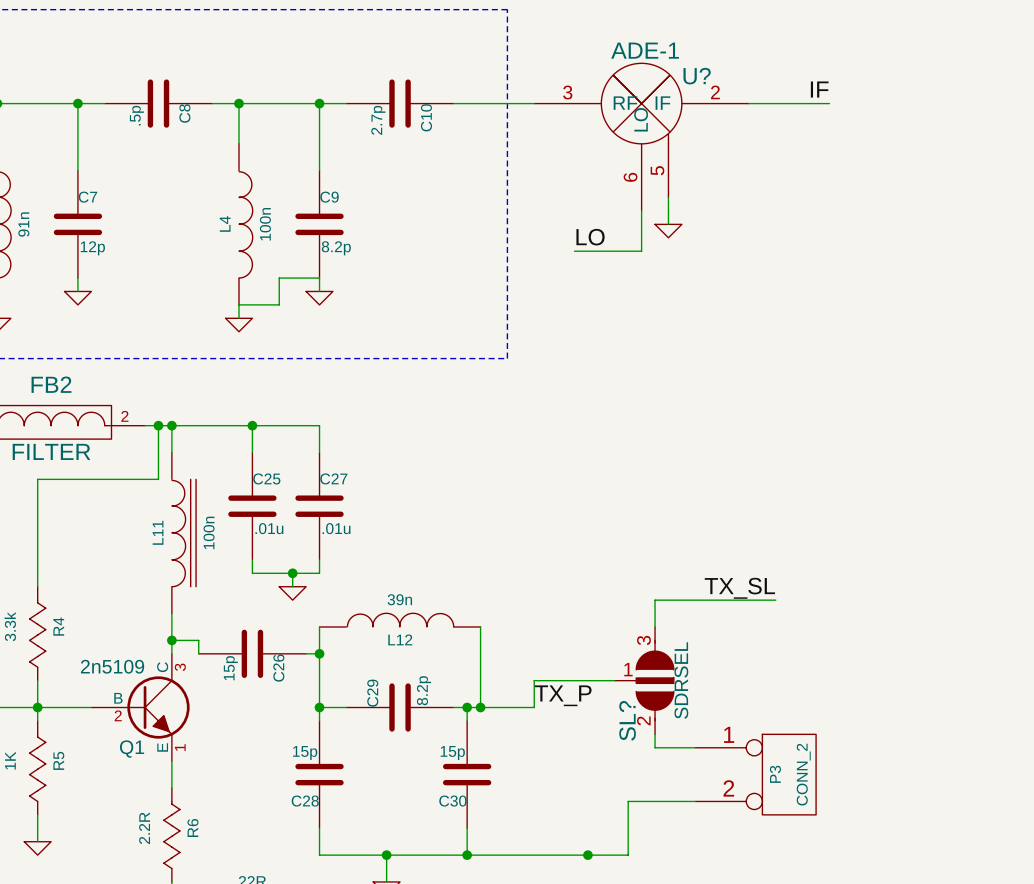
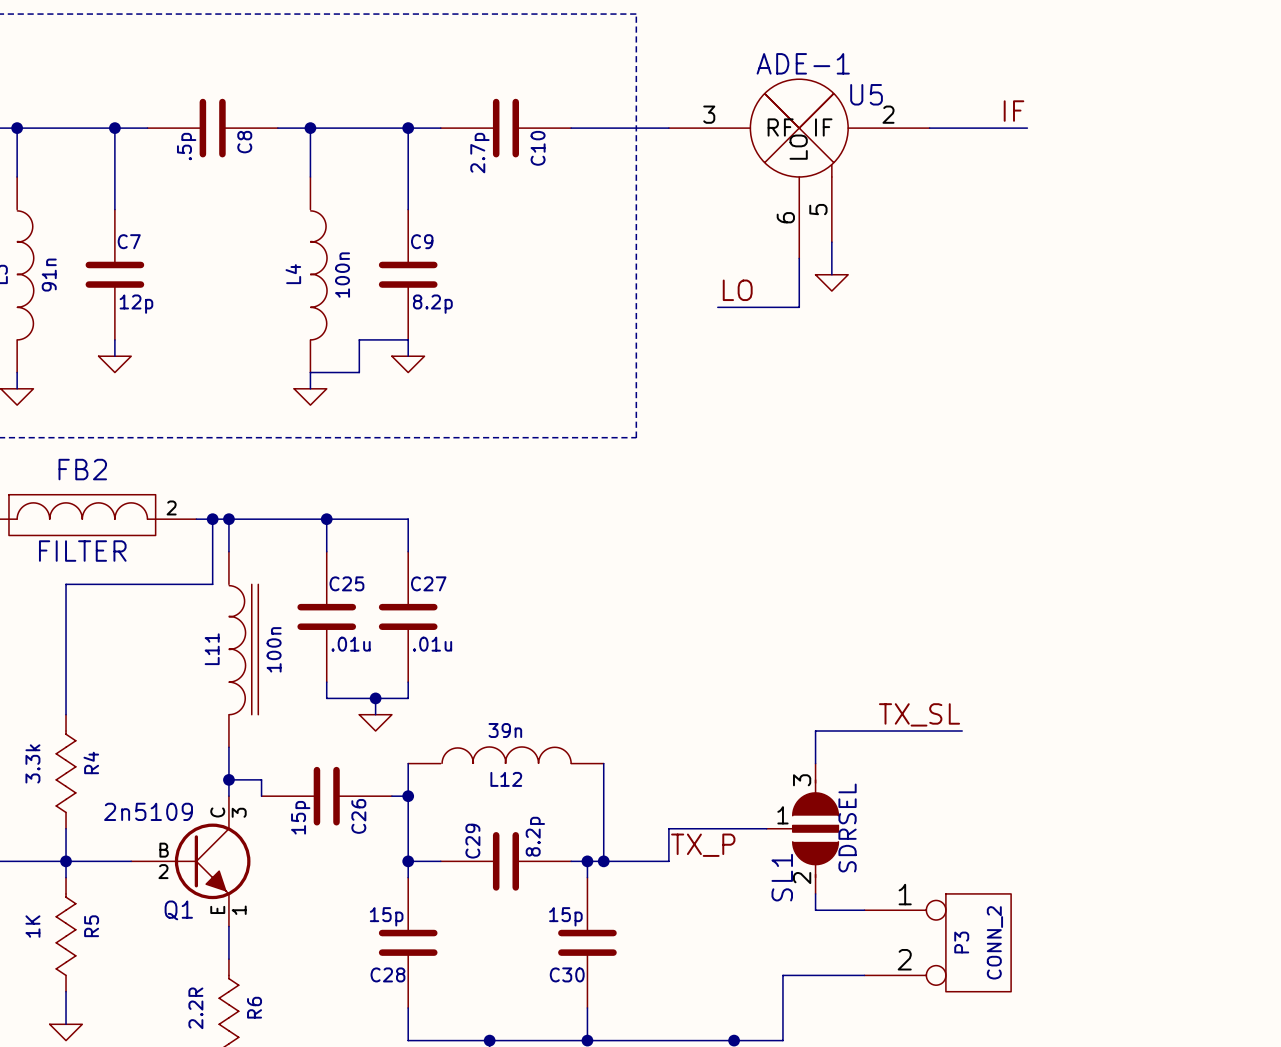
U? name: U? (697, 76) -> U5 (866, 94)
SL? name: SL? (627, 720) -> SL1 (782, 877)

